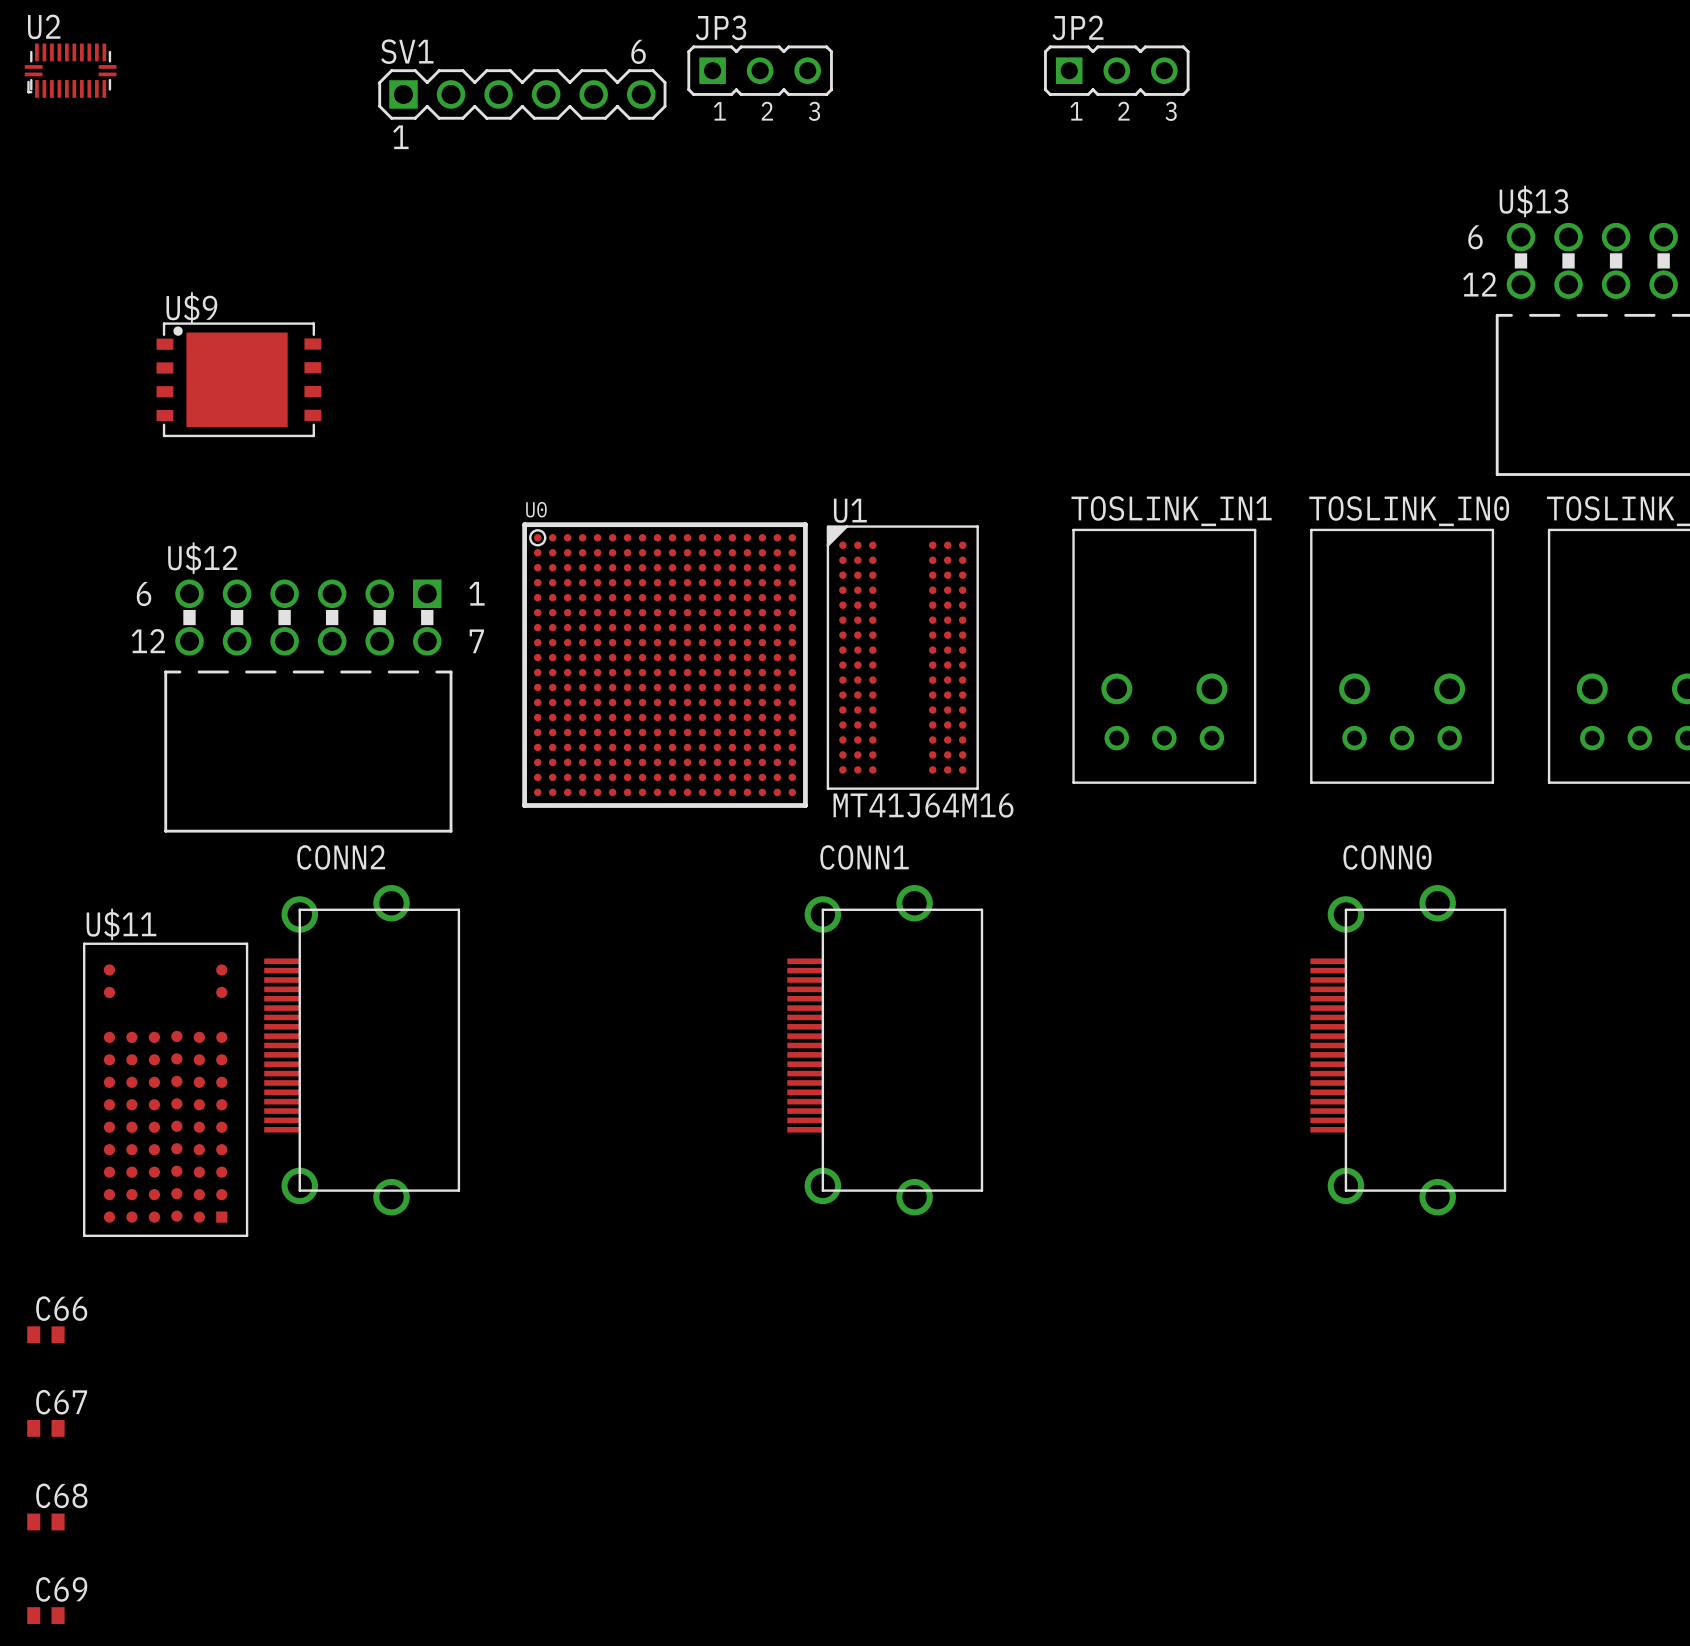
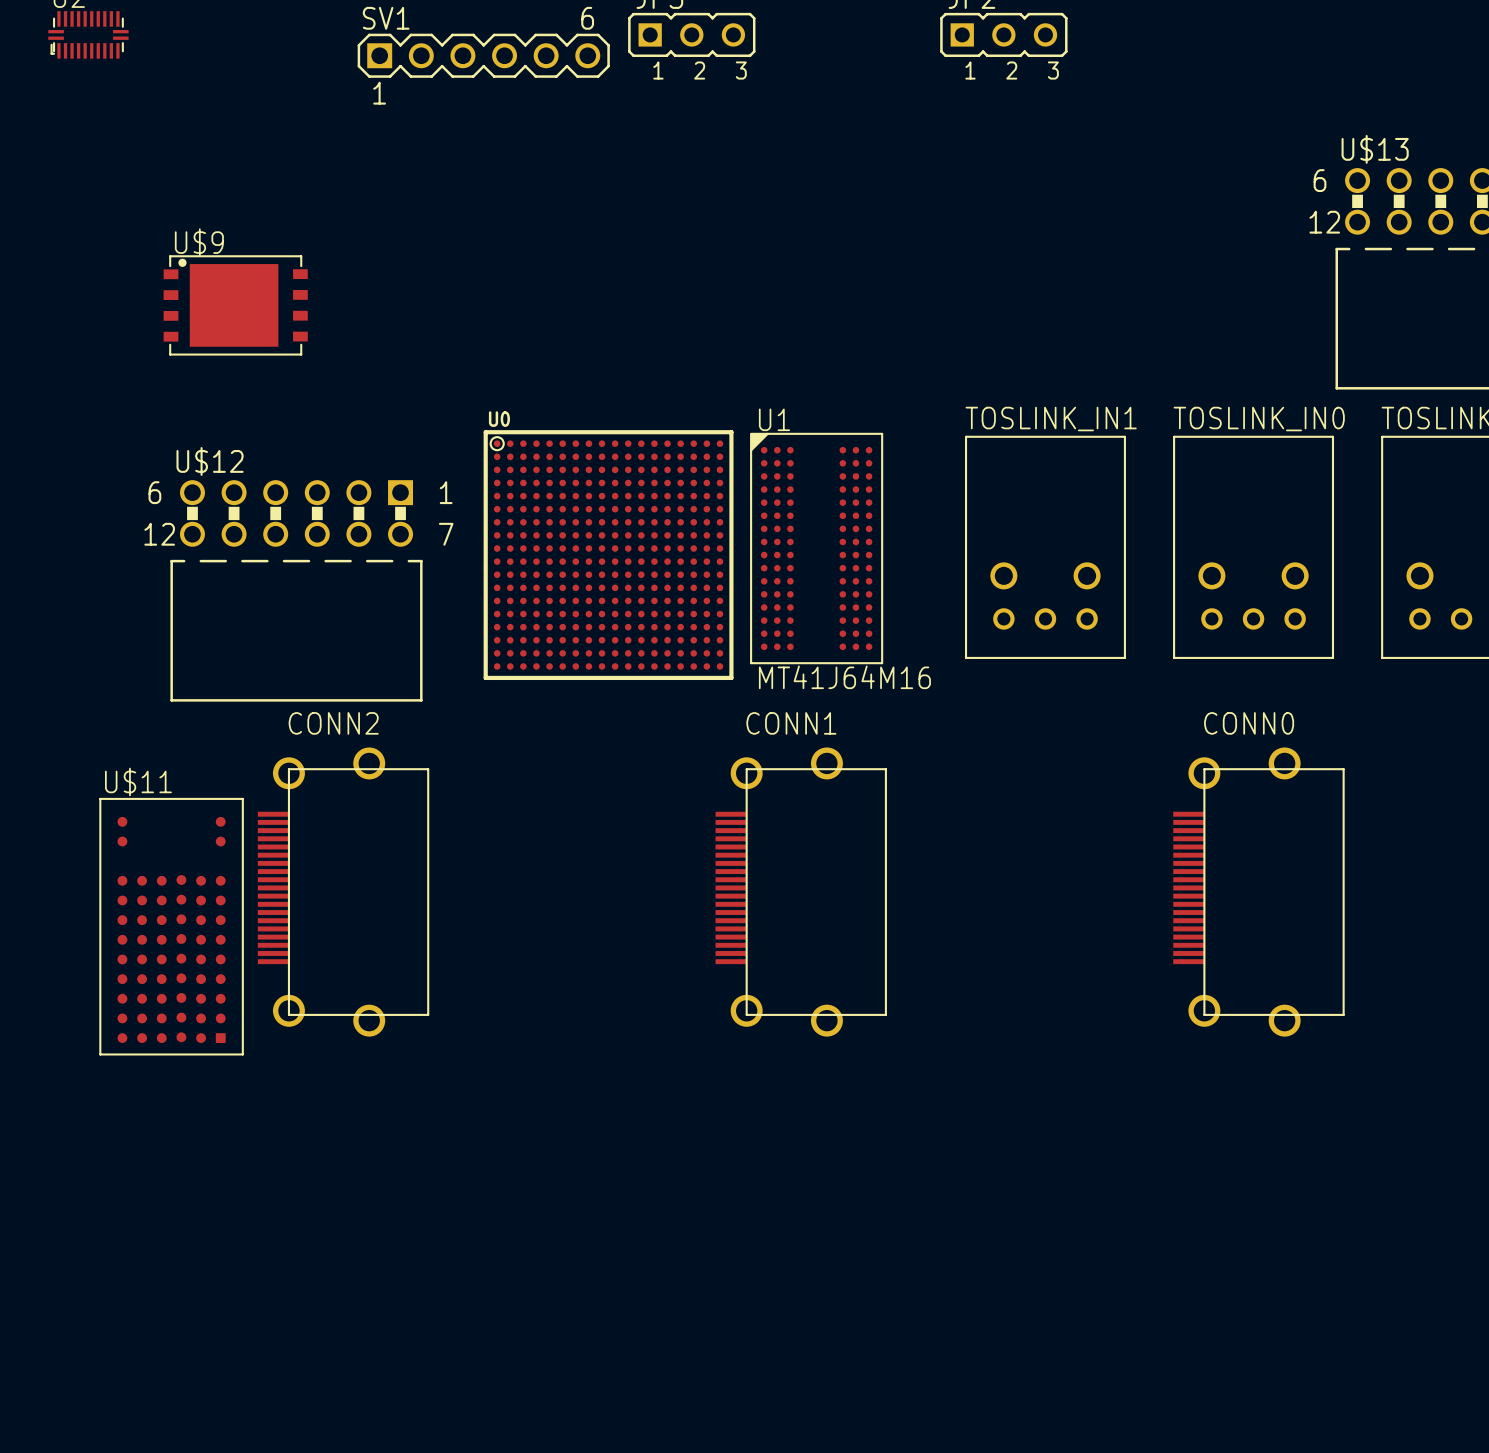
C66: (45, 1334) -> none
C67: (45, 1428) -> none
C68: (45, 1521) -> none
C69: (45, 1615) -> none

